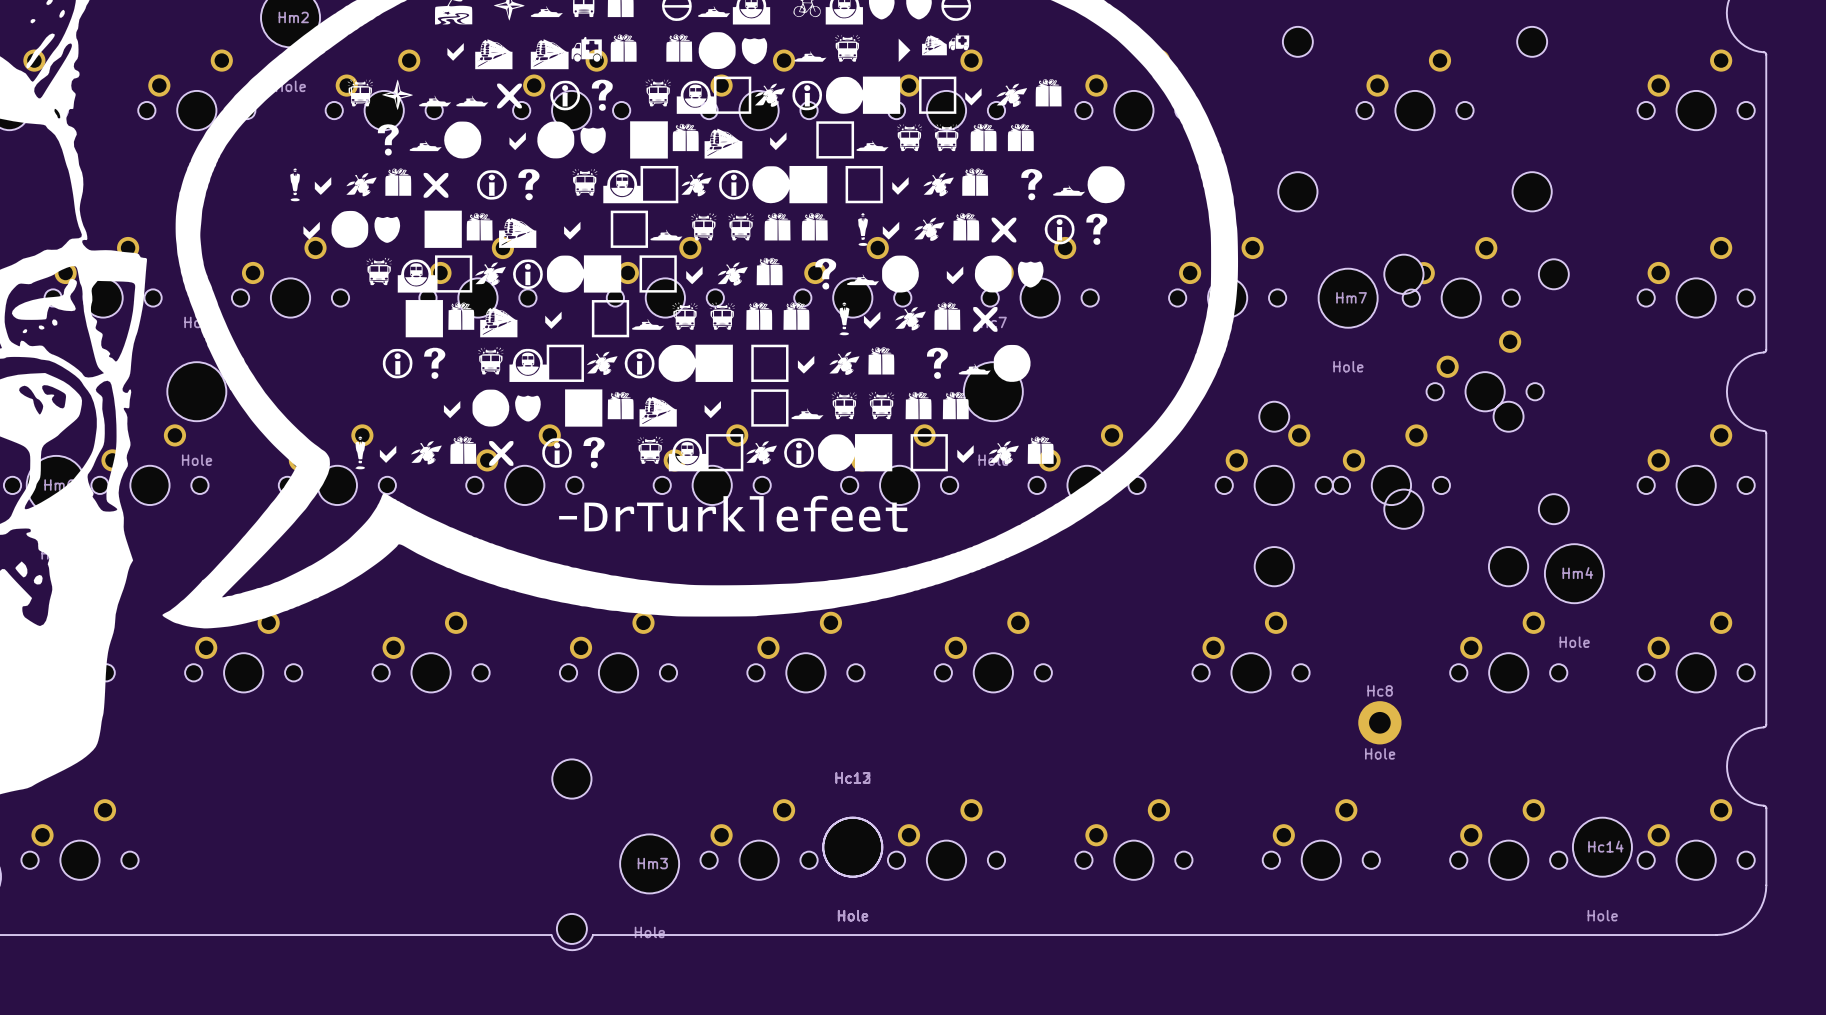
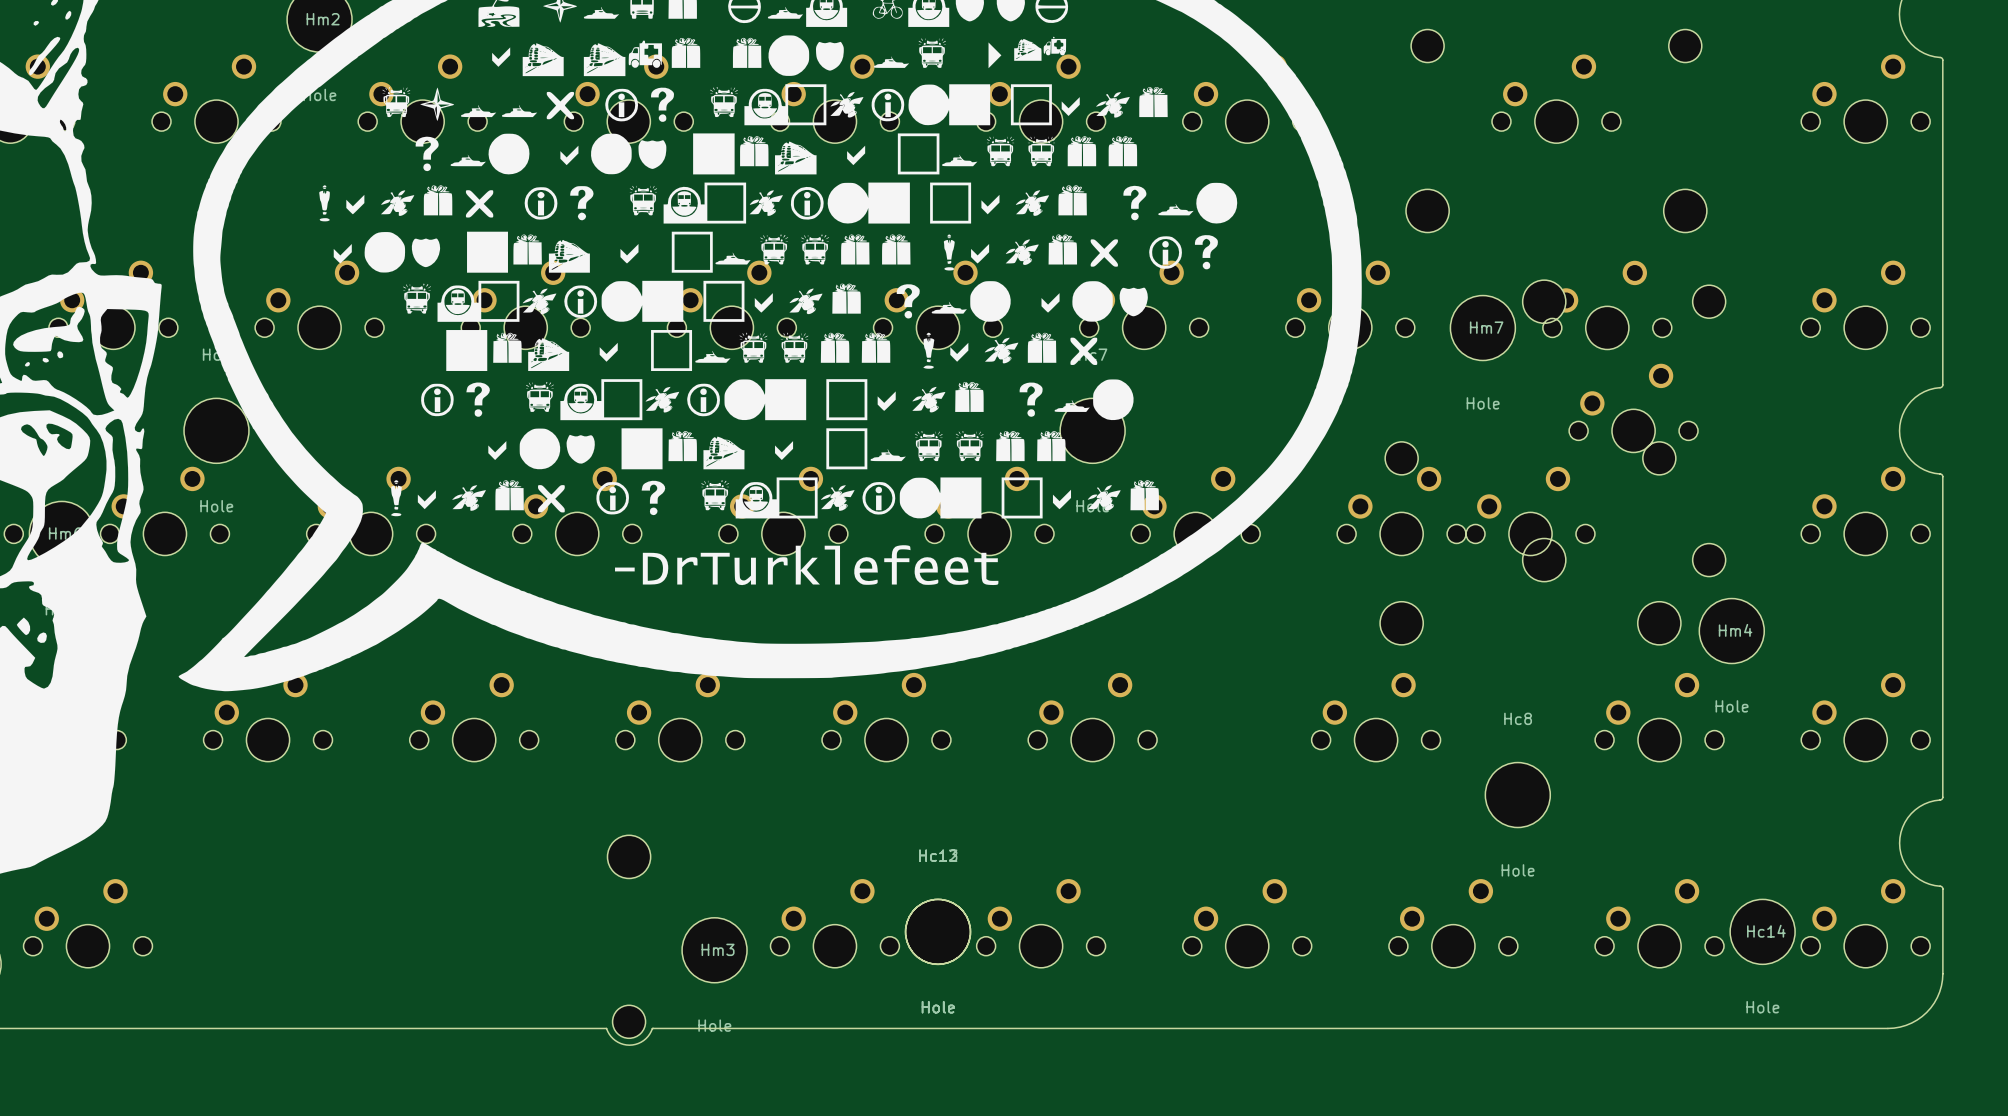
Hc8 name position: Hc8 (1380, 690) -> Hc8 (1518, 718)
Hc8 footprint: [1358, 701, 1402, 745] -> [1485, 762, 1551, 828]
Hc8 value position: Hole (1380, 753) -> Hole (1518, 870)

